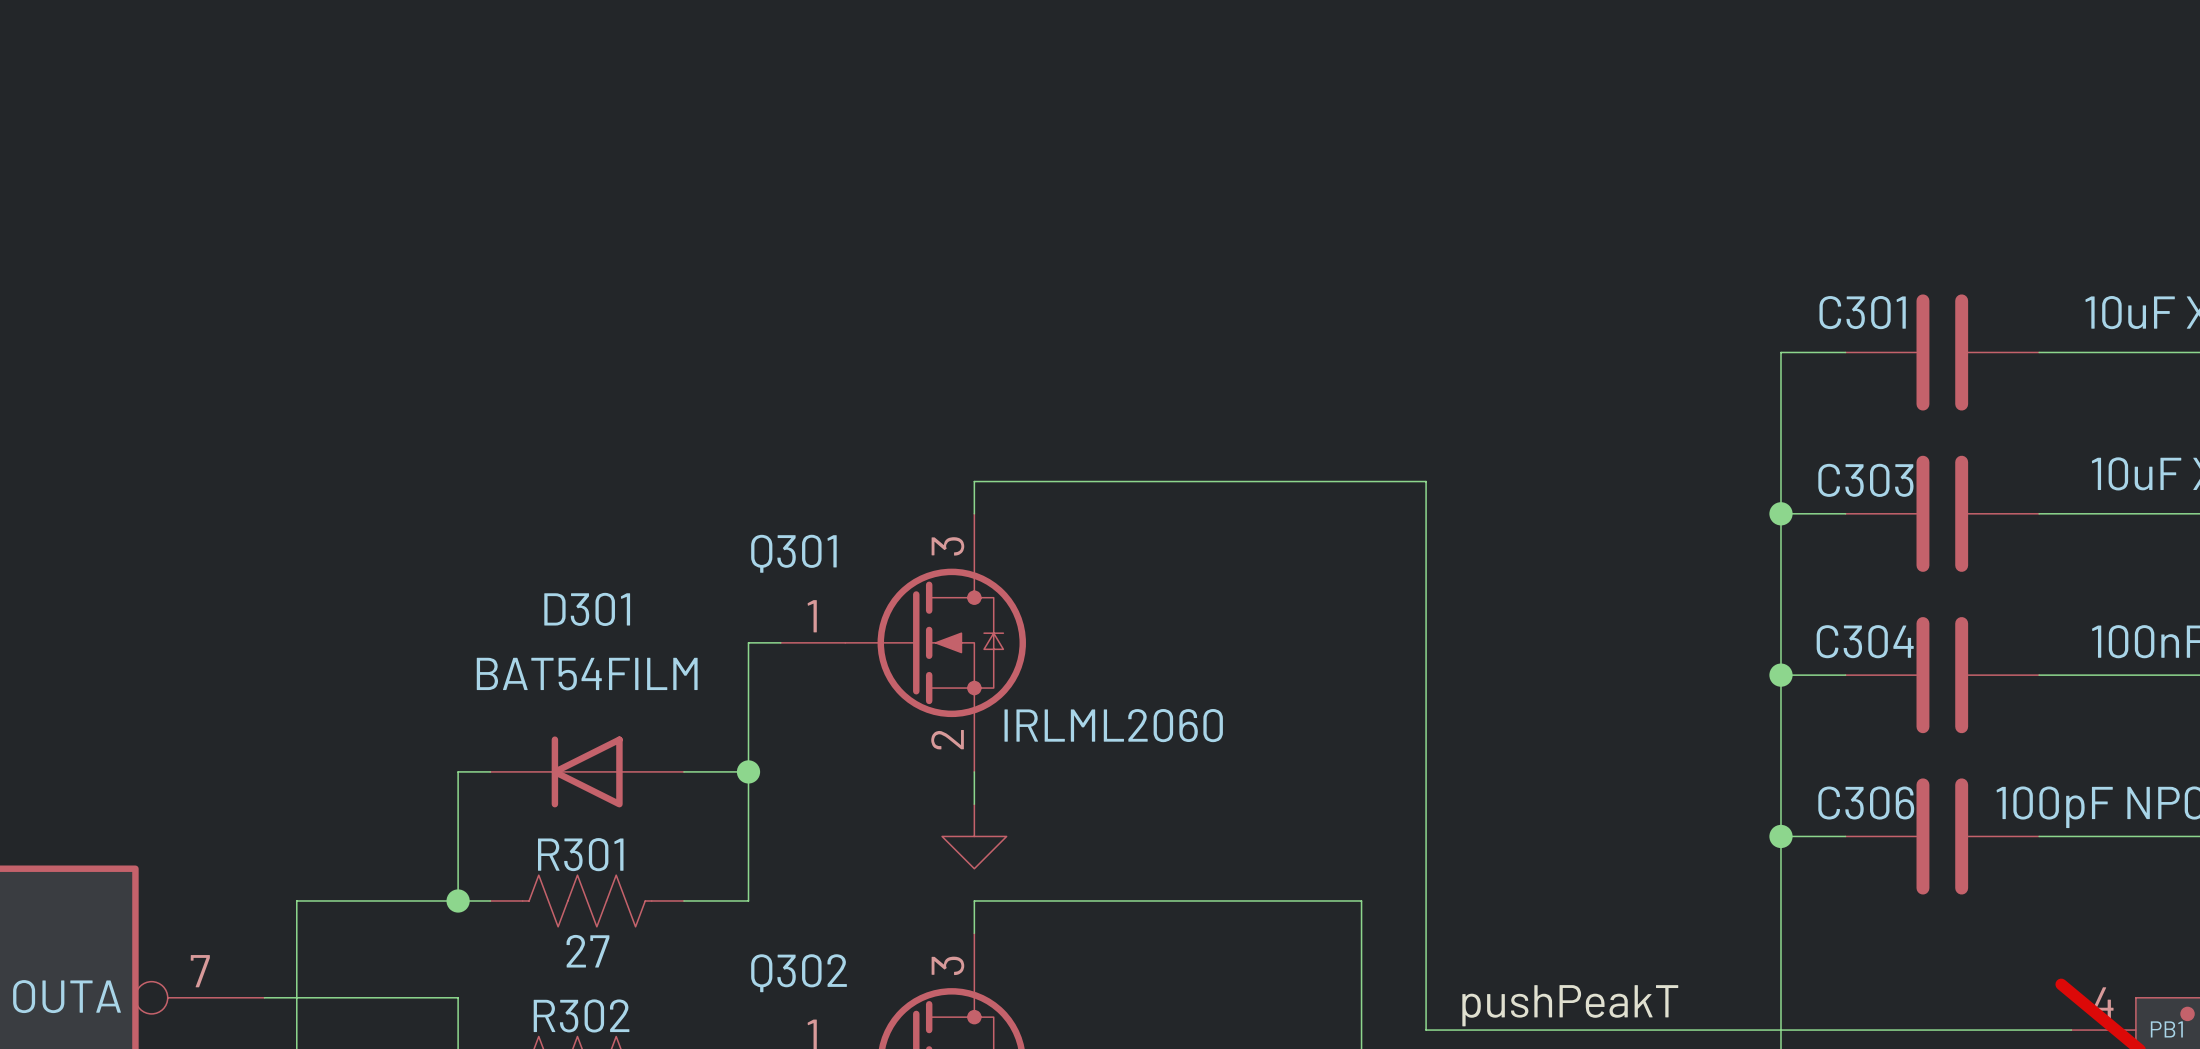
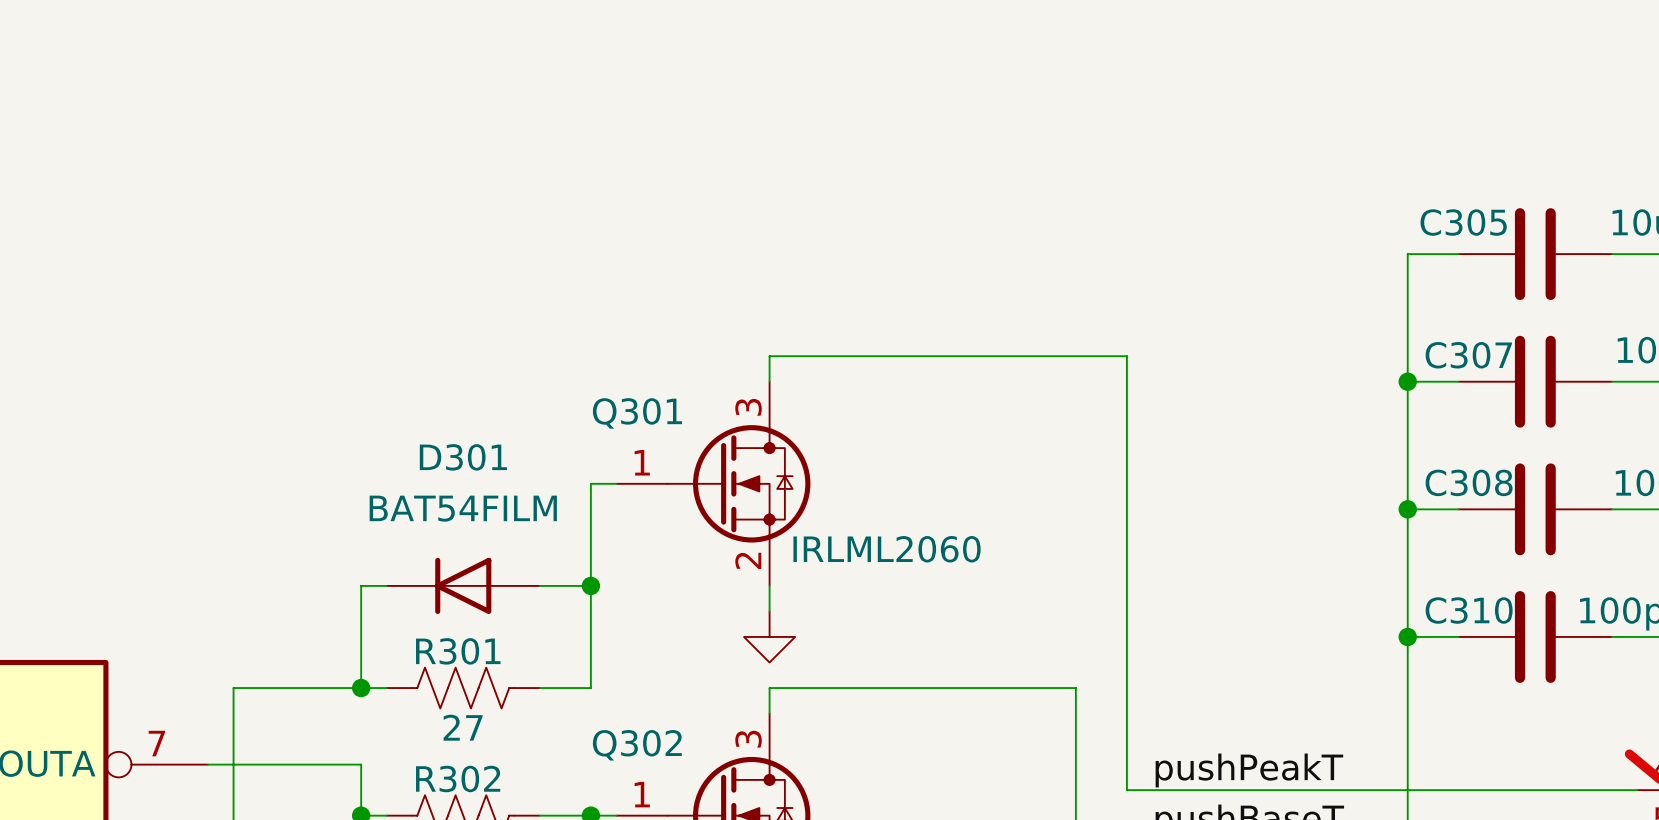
C301 name: C301 (1862, 312) -> C305 (1463, 222)
C303 name: C303 (1865, 480) -> C307 (1468, 355)
C304 name: C304 (1865, 641) -> C308 (1469, 482)
C306 name: C306 (1866, 803) -> C310 (1469, 610)

